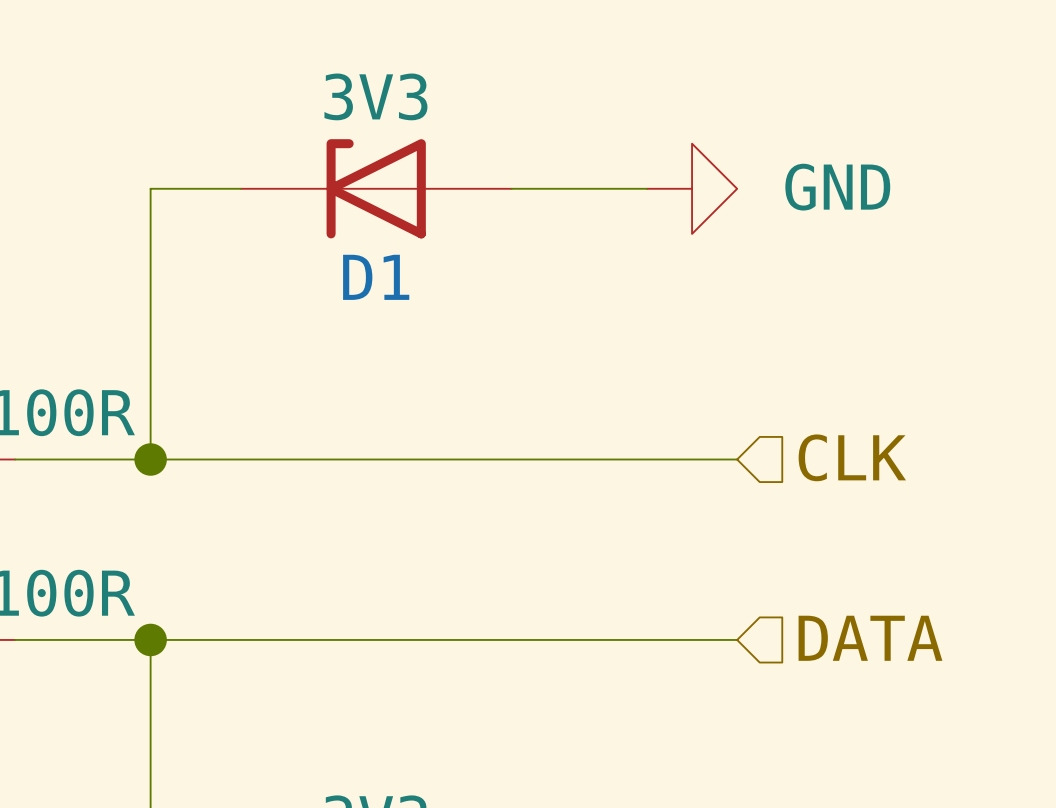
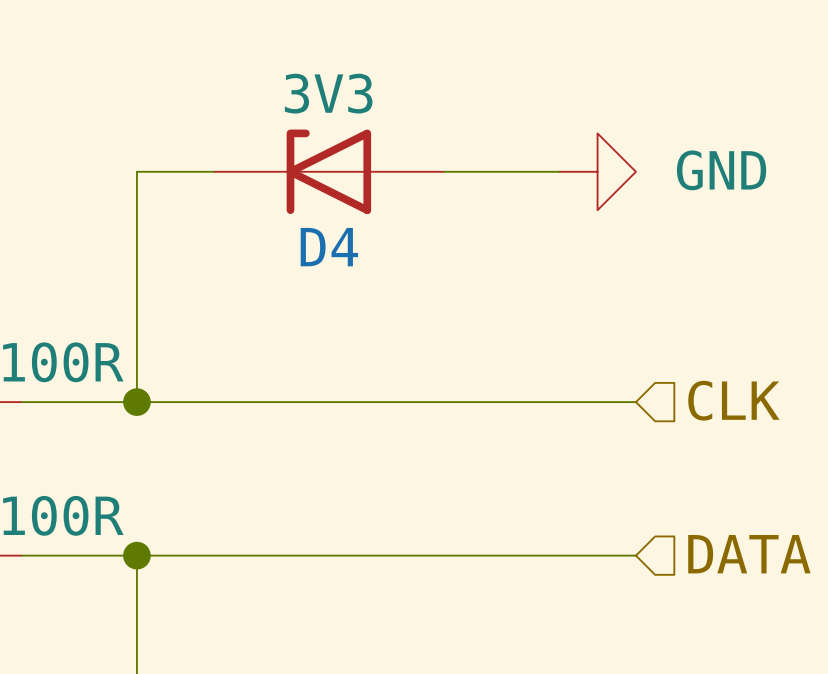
D1 name: D1 (376, 277) -> D4 (329, 247)

